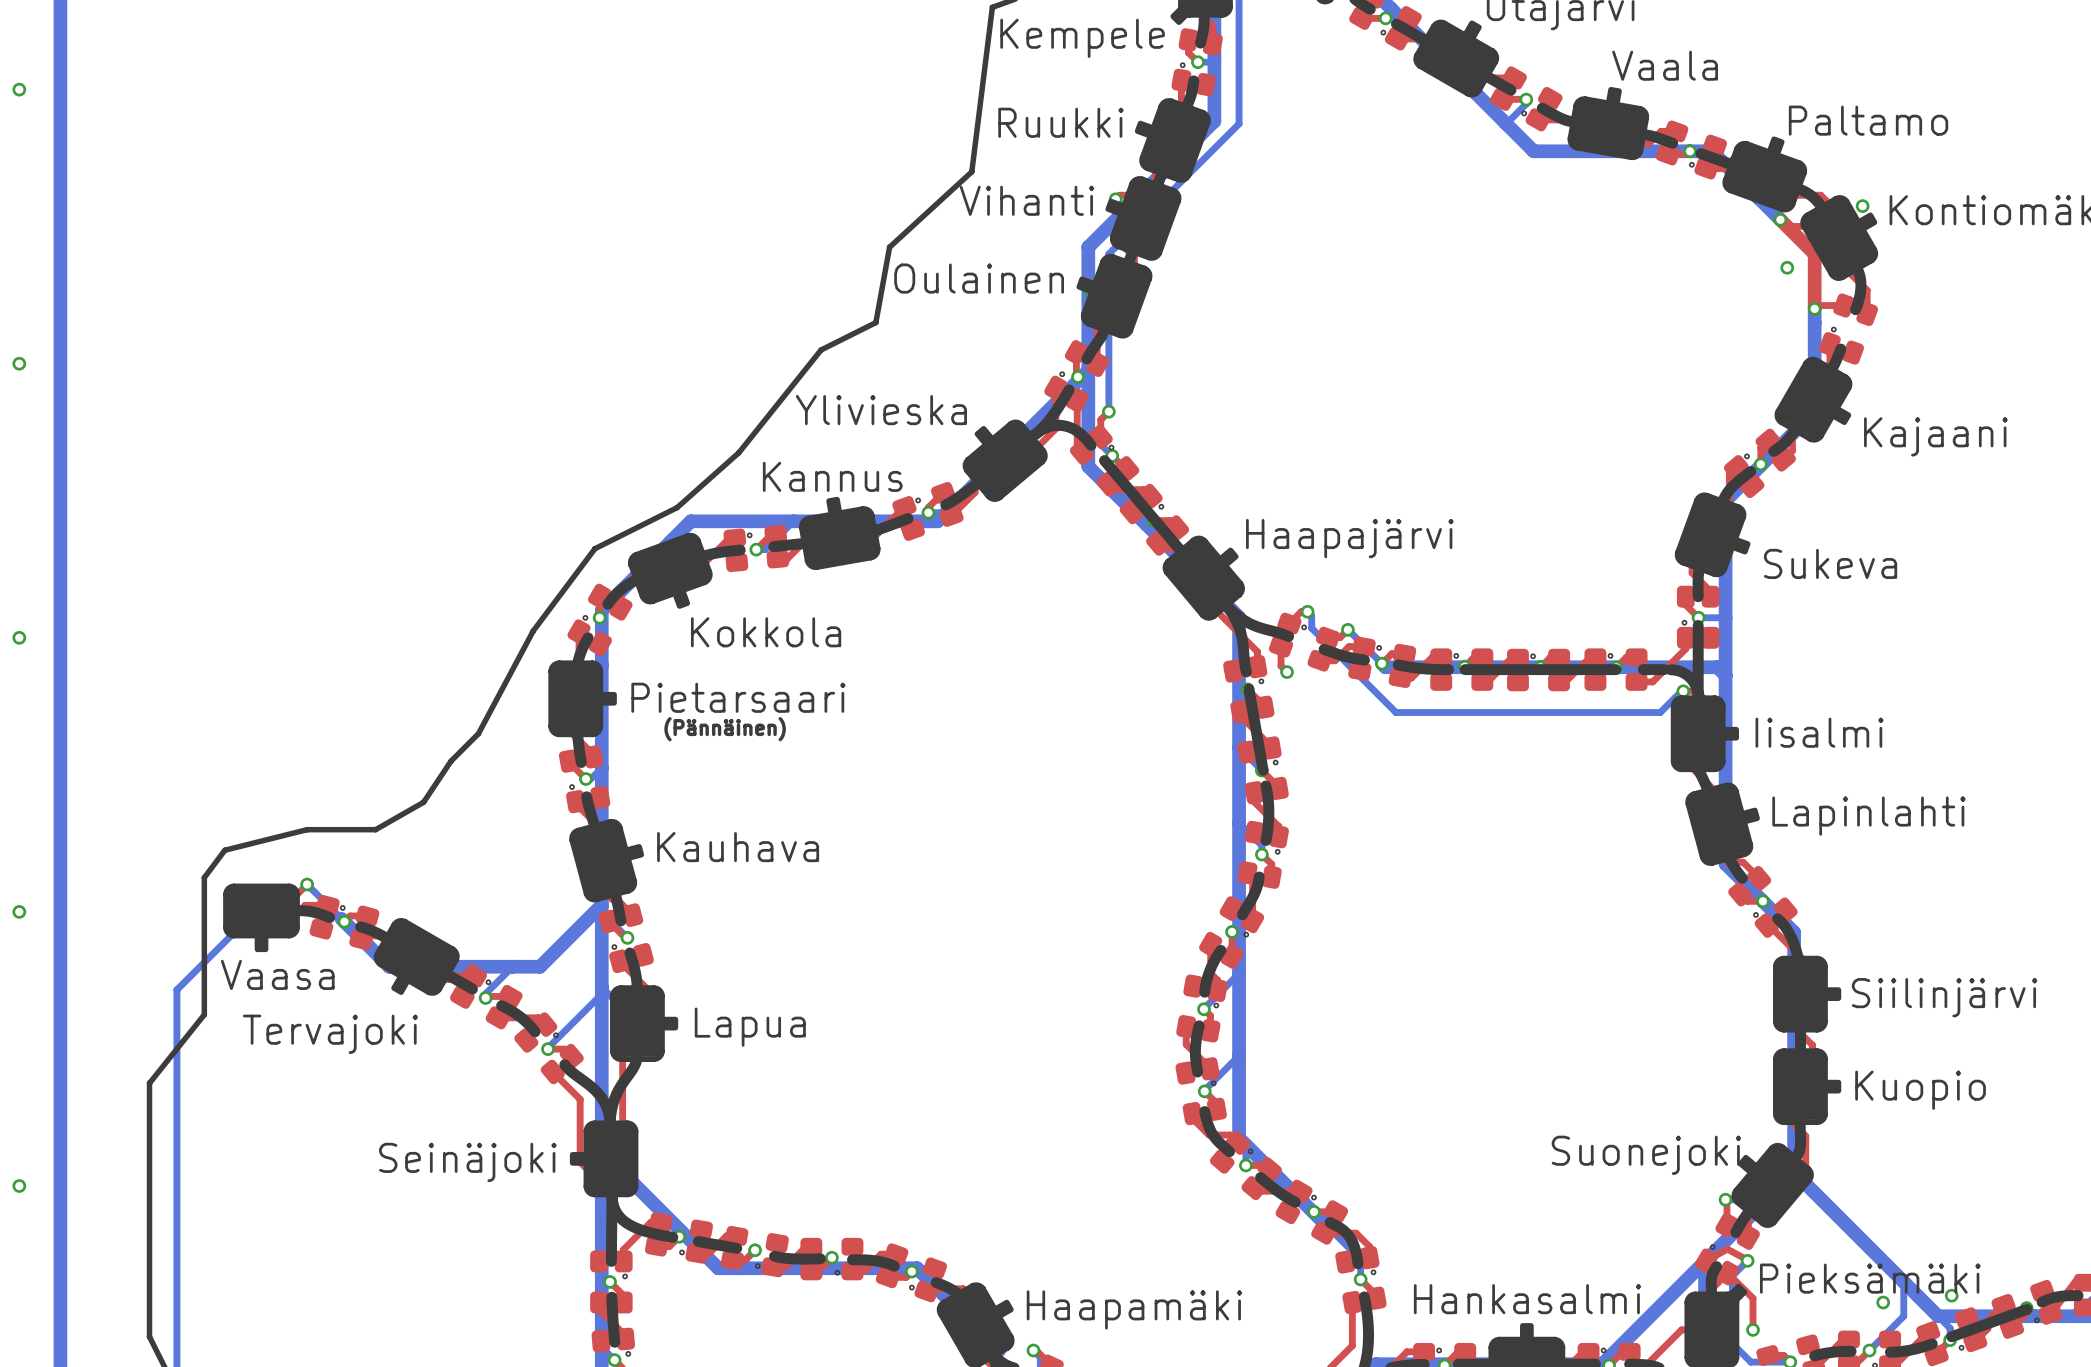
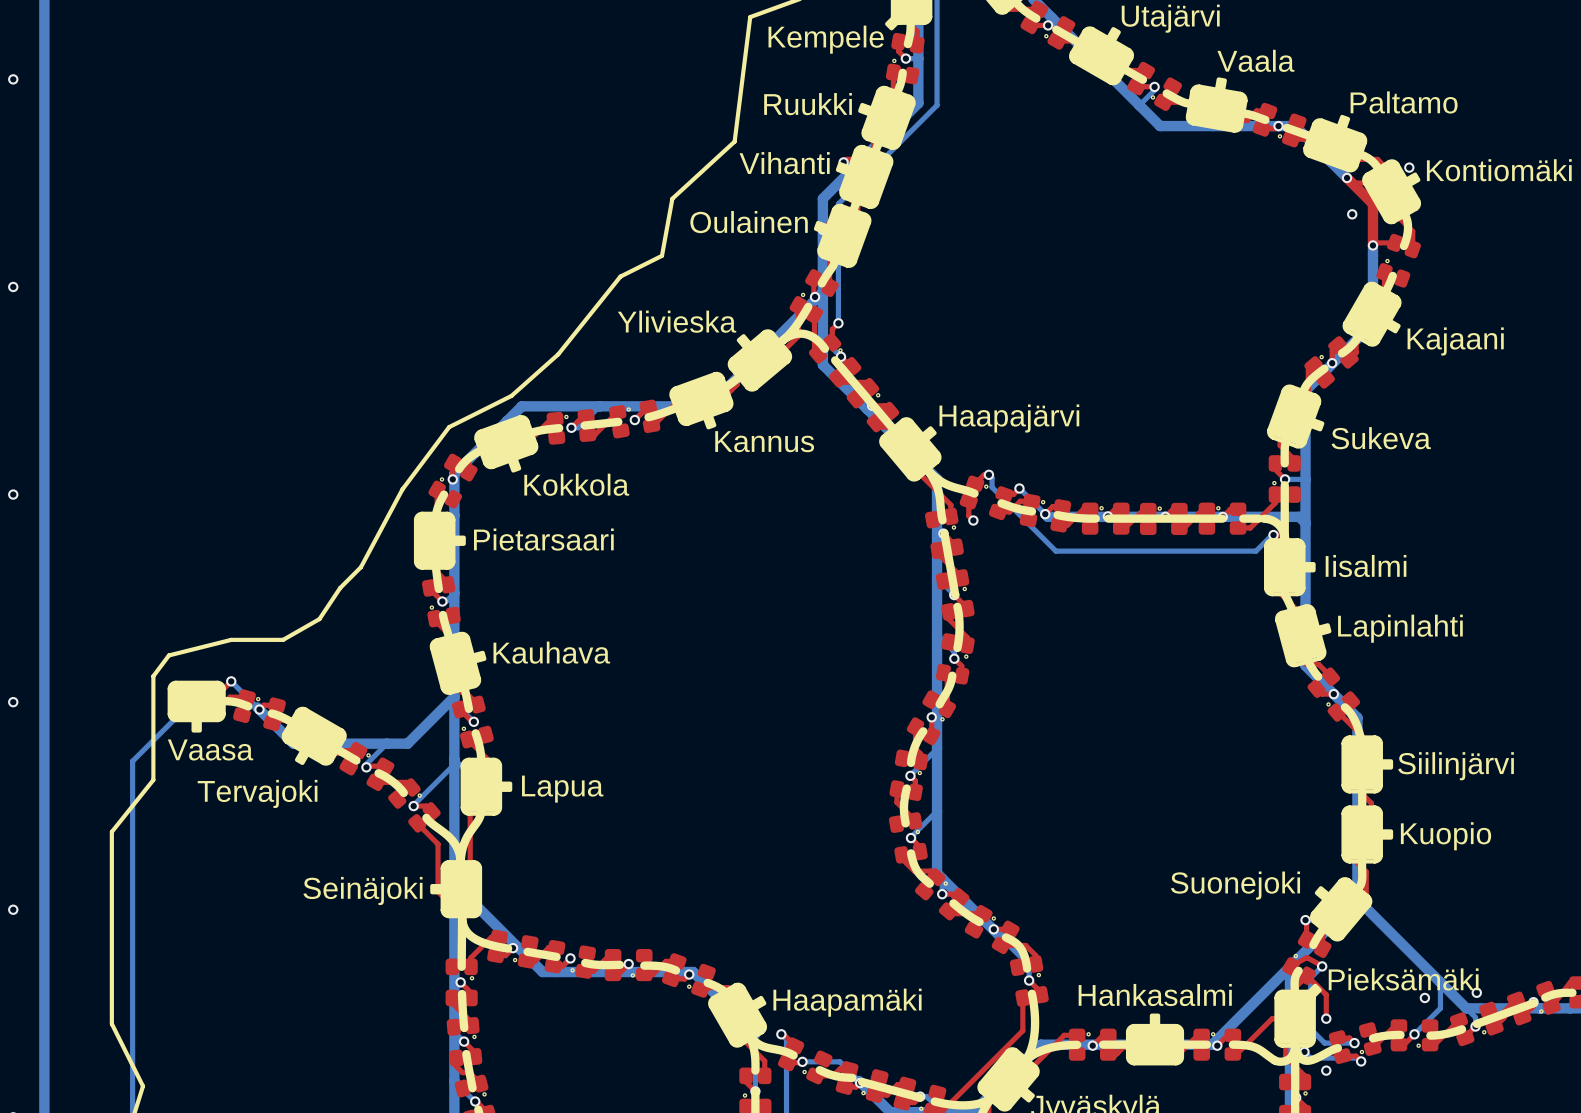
drawing: none -> [669, 371, 734, 430]
drawing: [798, 496, 881, 571] -> none
drawing shape: [627, 532, 842, 648] -> [474, 415, 630, 496]
text: (Pännäinen) (725, 729) -> none

